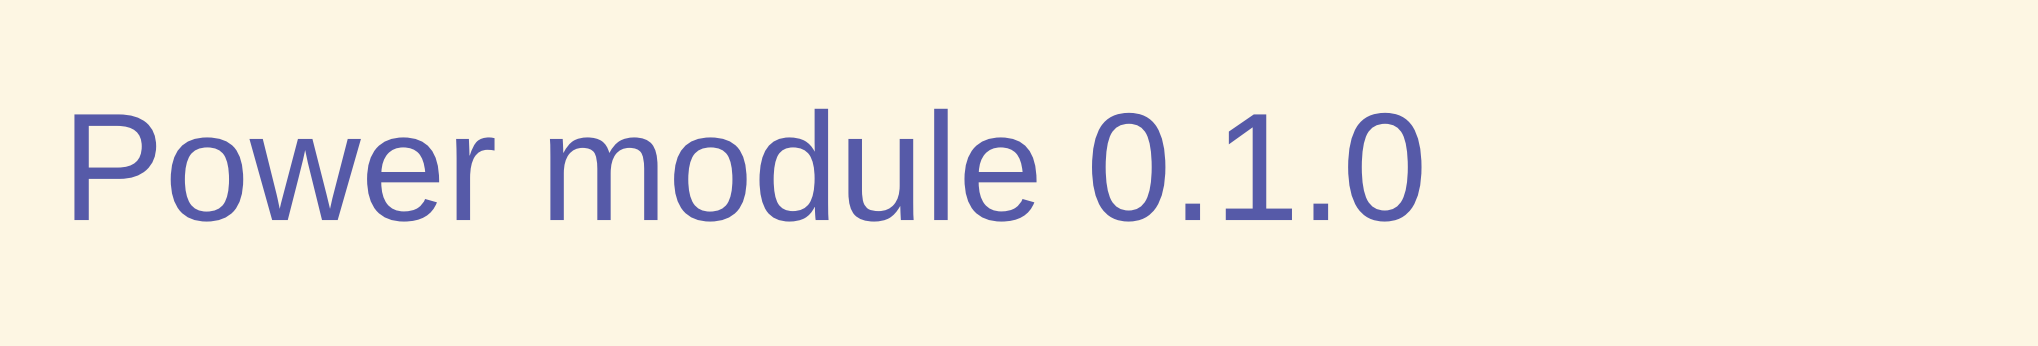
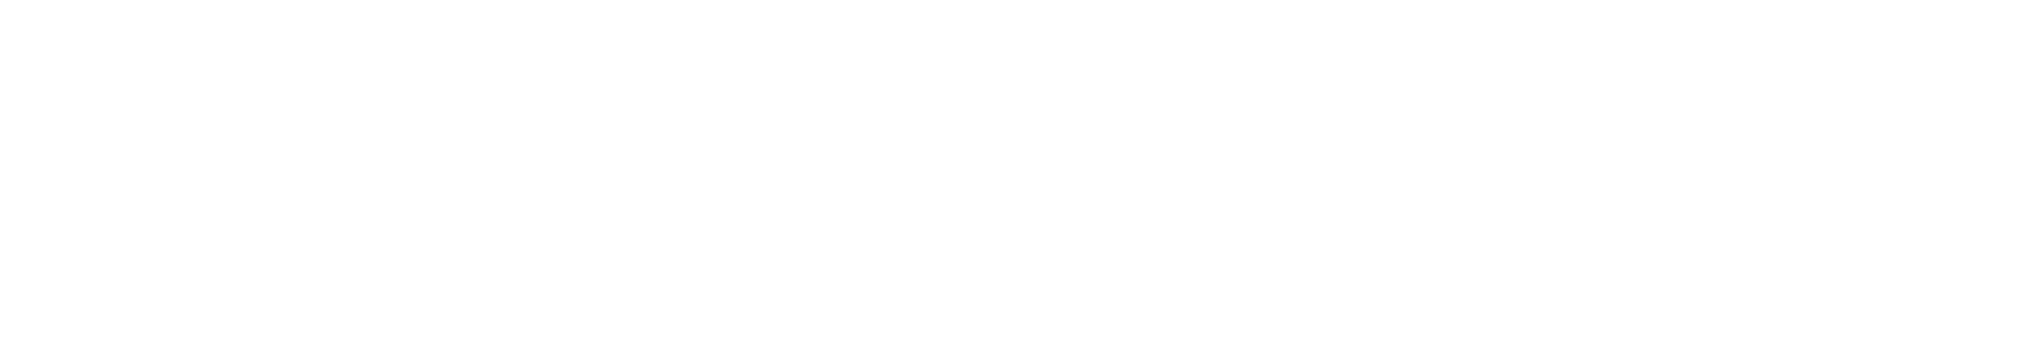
text: Power module 0.1.0 (747, 165) -> none

